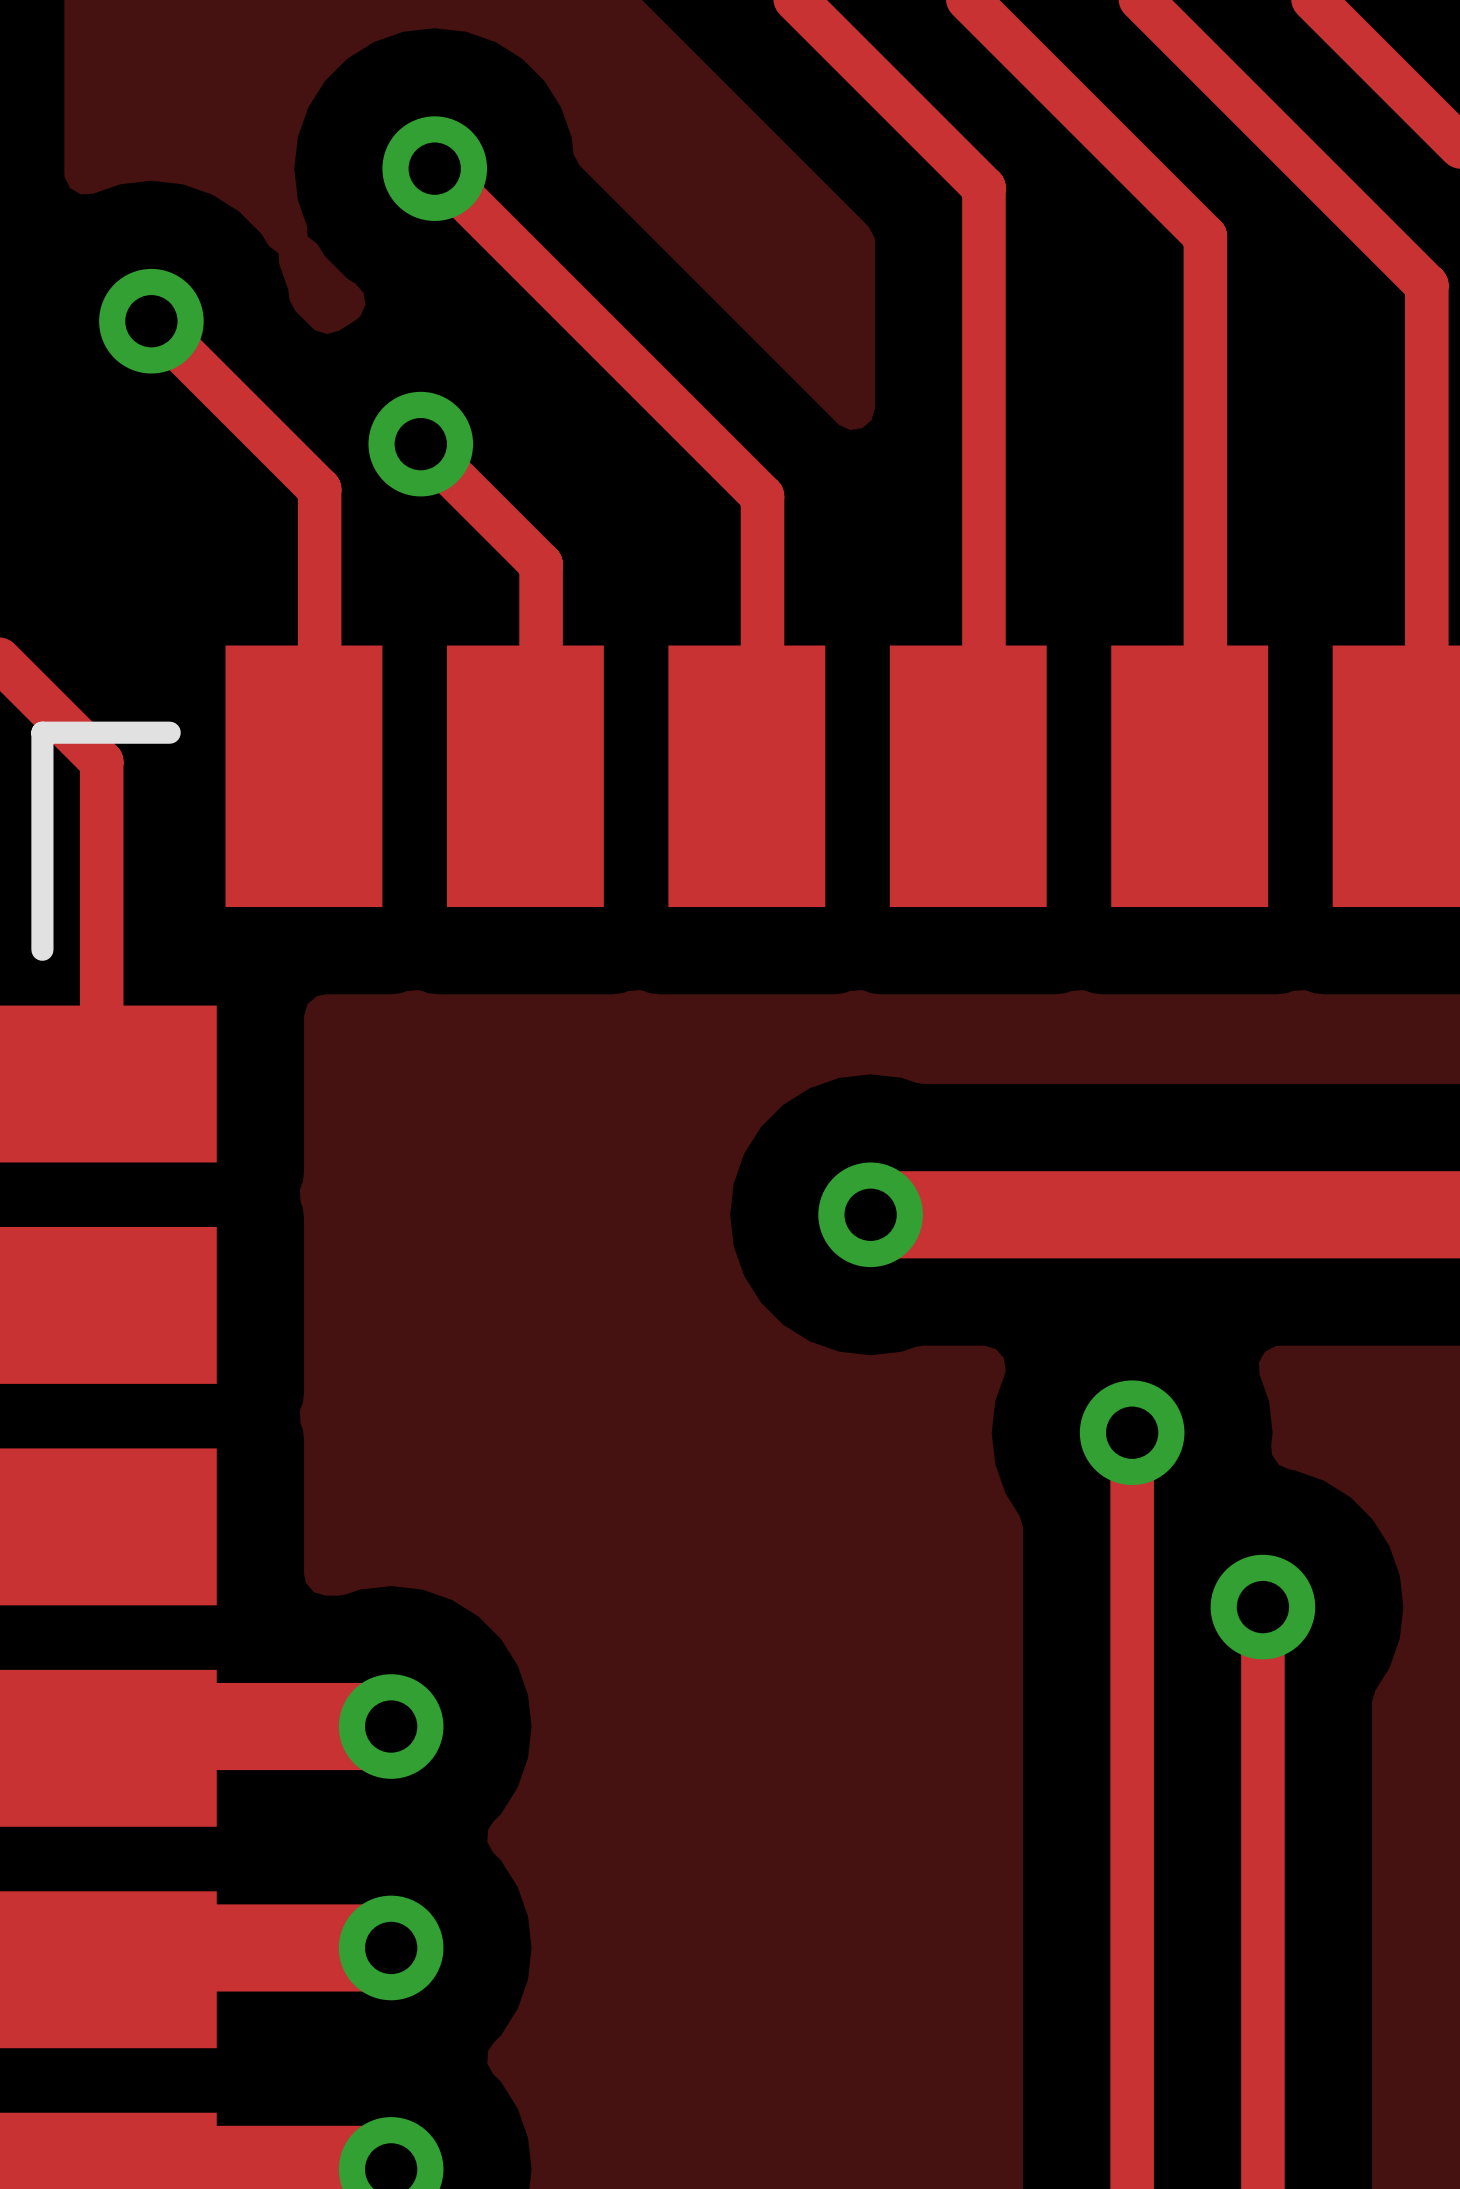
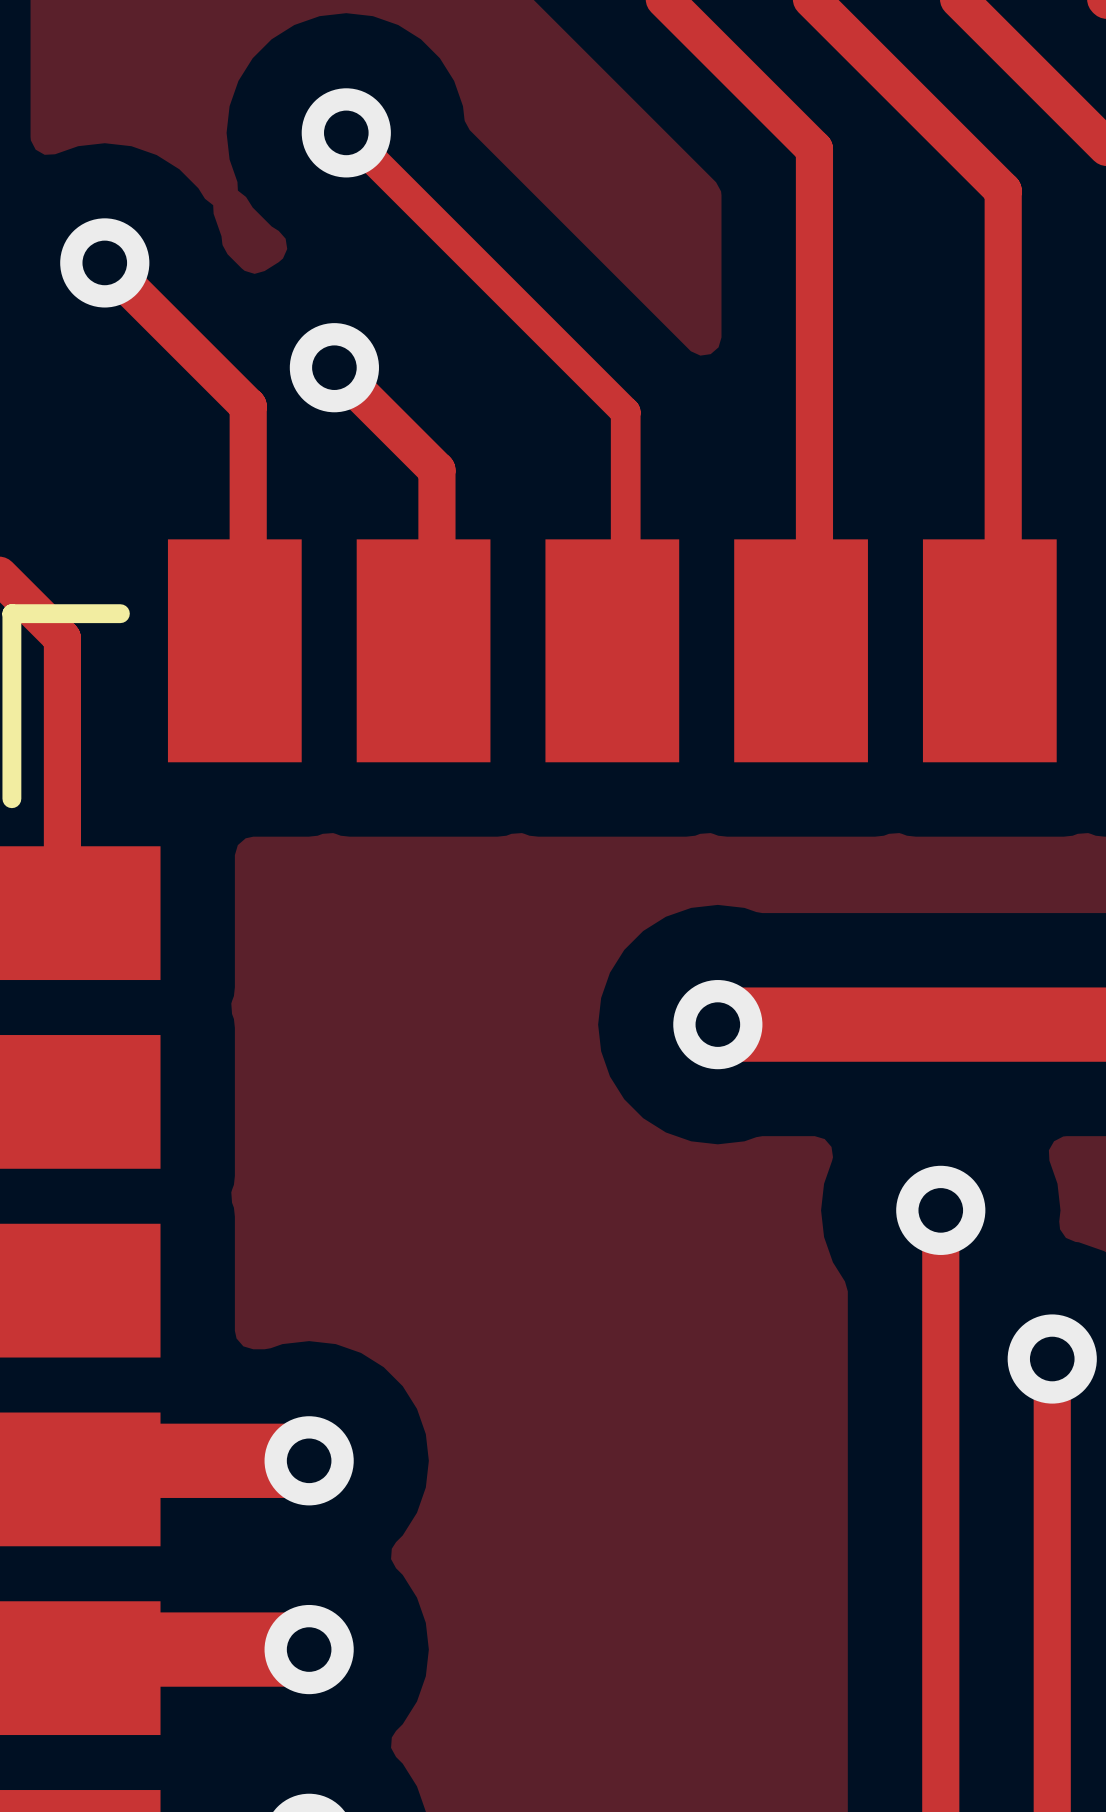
track width: thick (434, 168) (762, 496) (762, 754) -> thin (346, 132) (625, 412) (625, 632)

